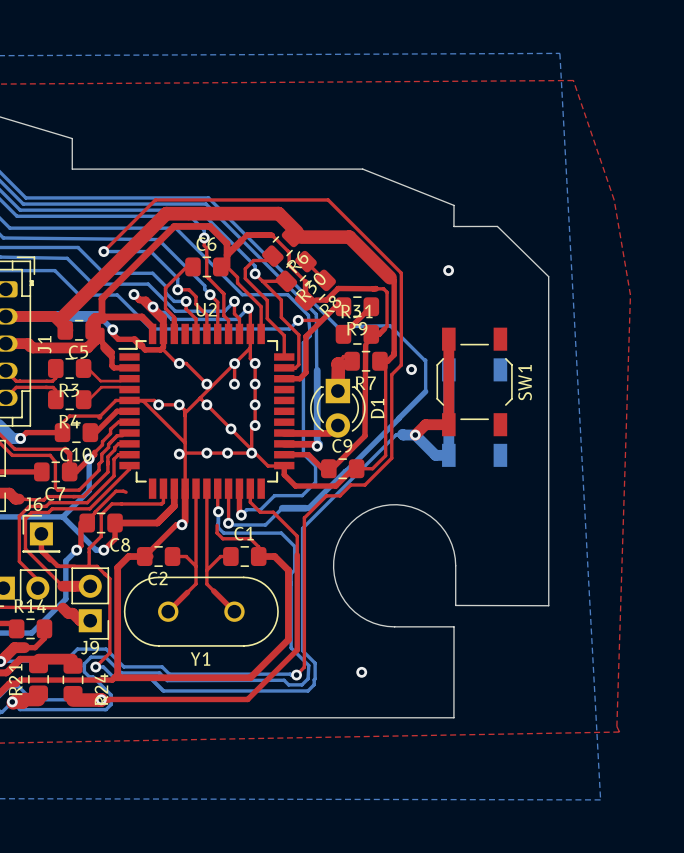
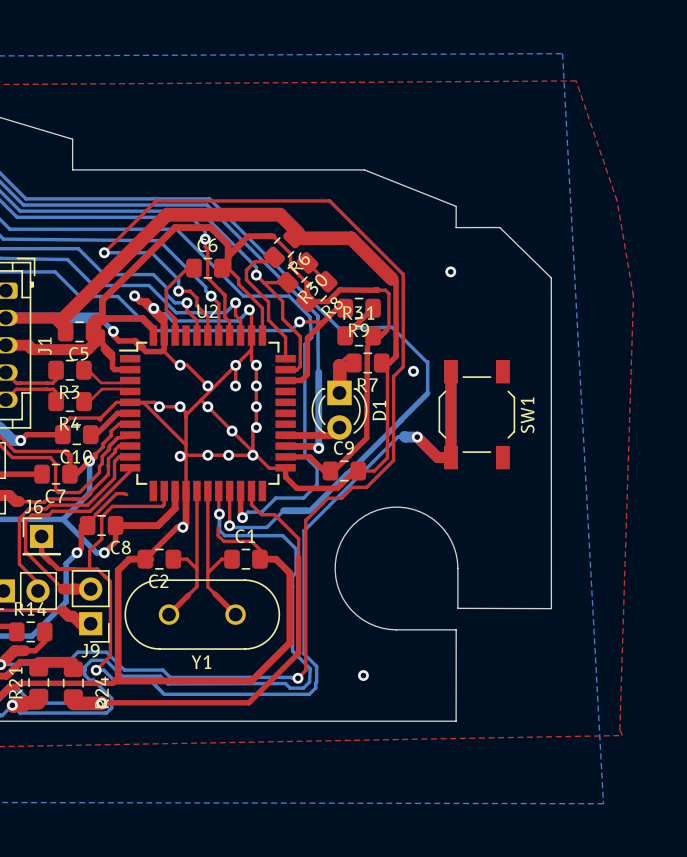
top track: (448, 339) (448, 369) -> none
SW1 position: (474, 381) -> (476, 414)
top track: (448, 424) (425, 424) (415, 435) -> (450, 426) (450, 457) (437, 457) (417, 437)

